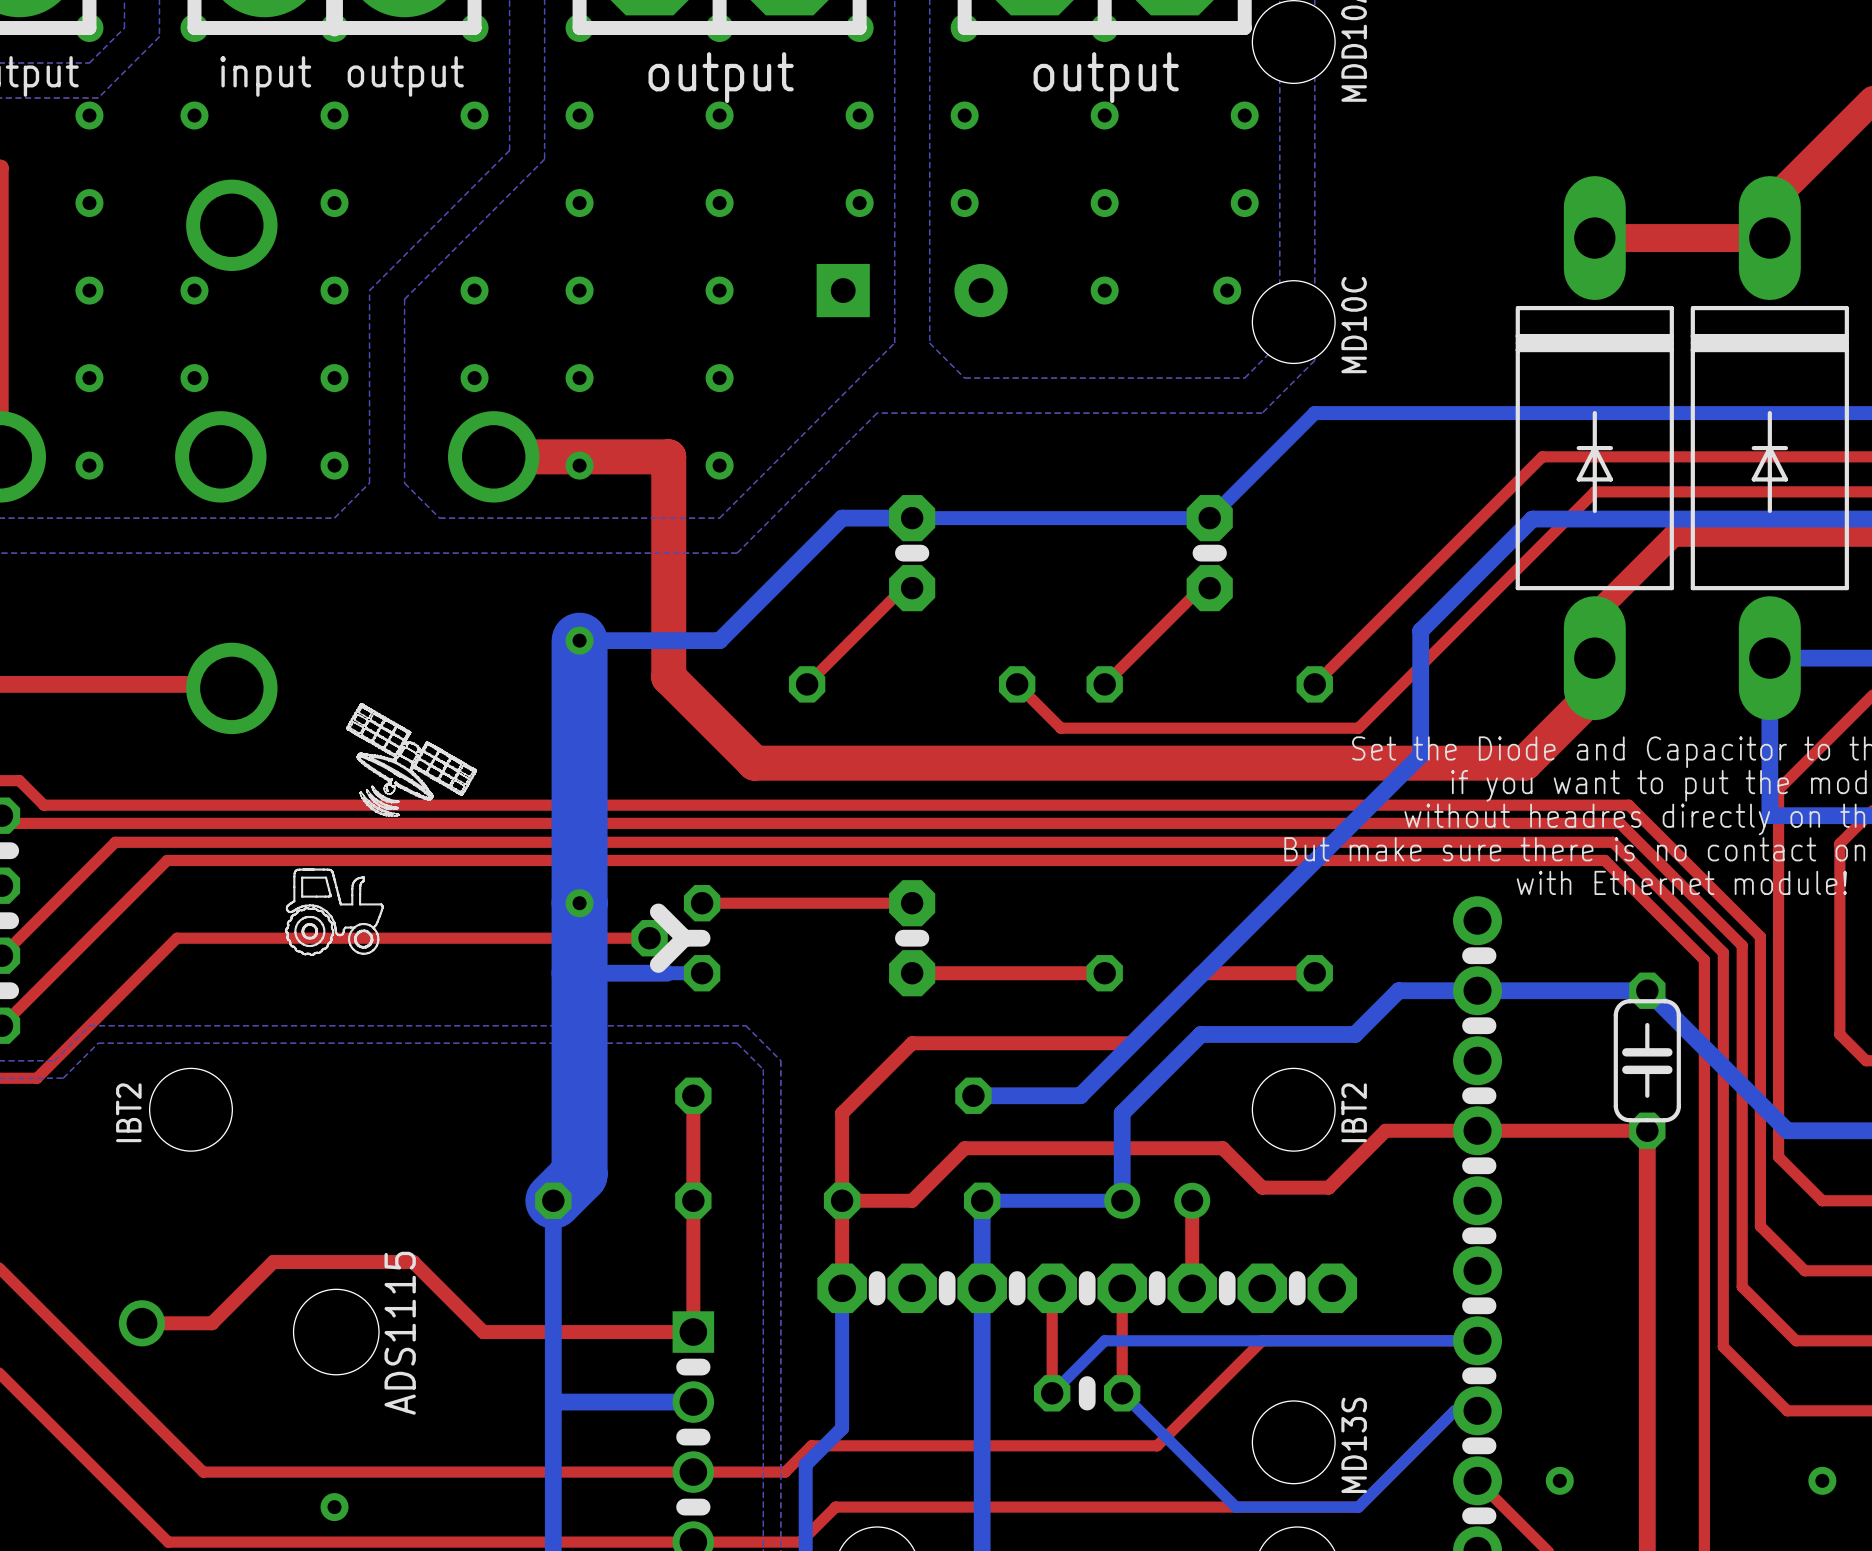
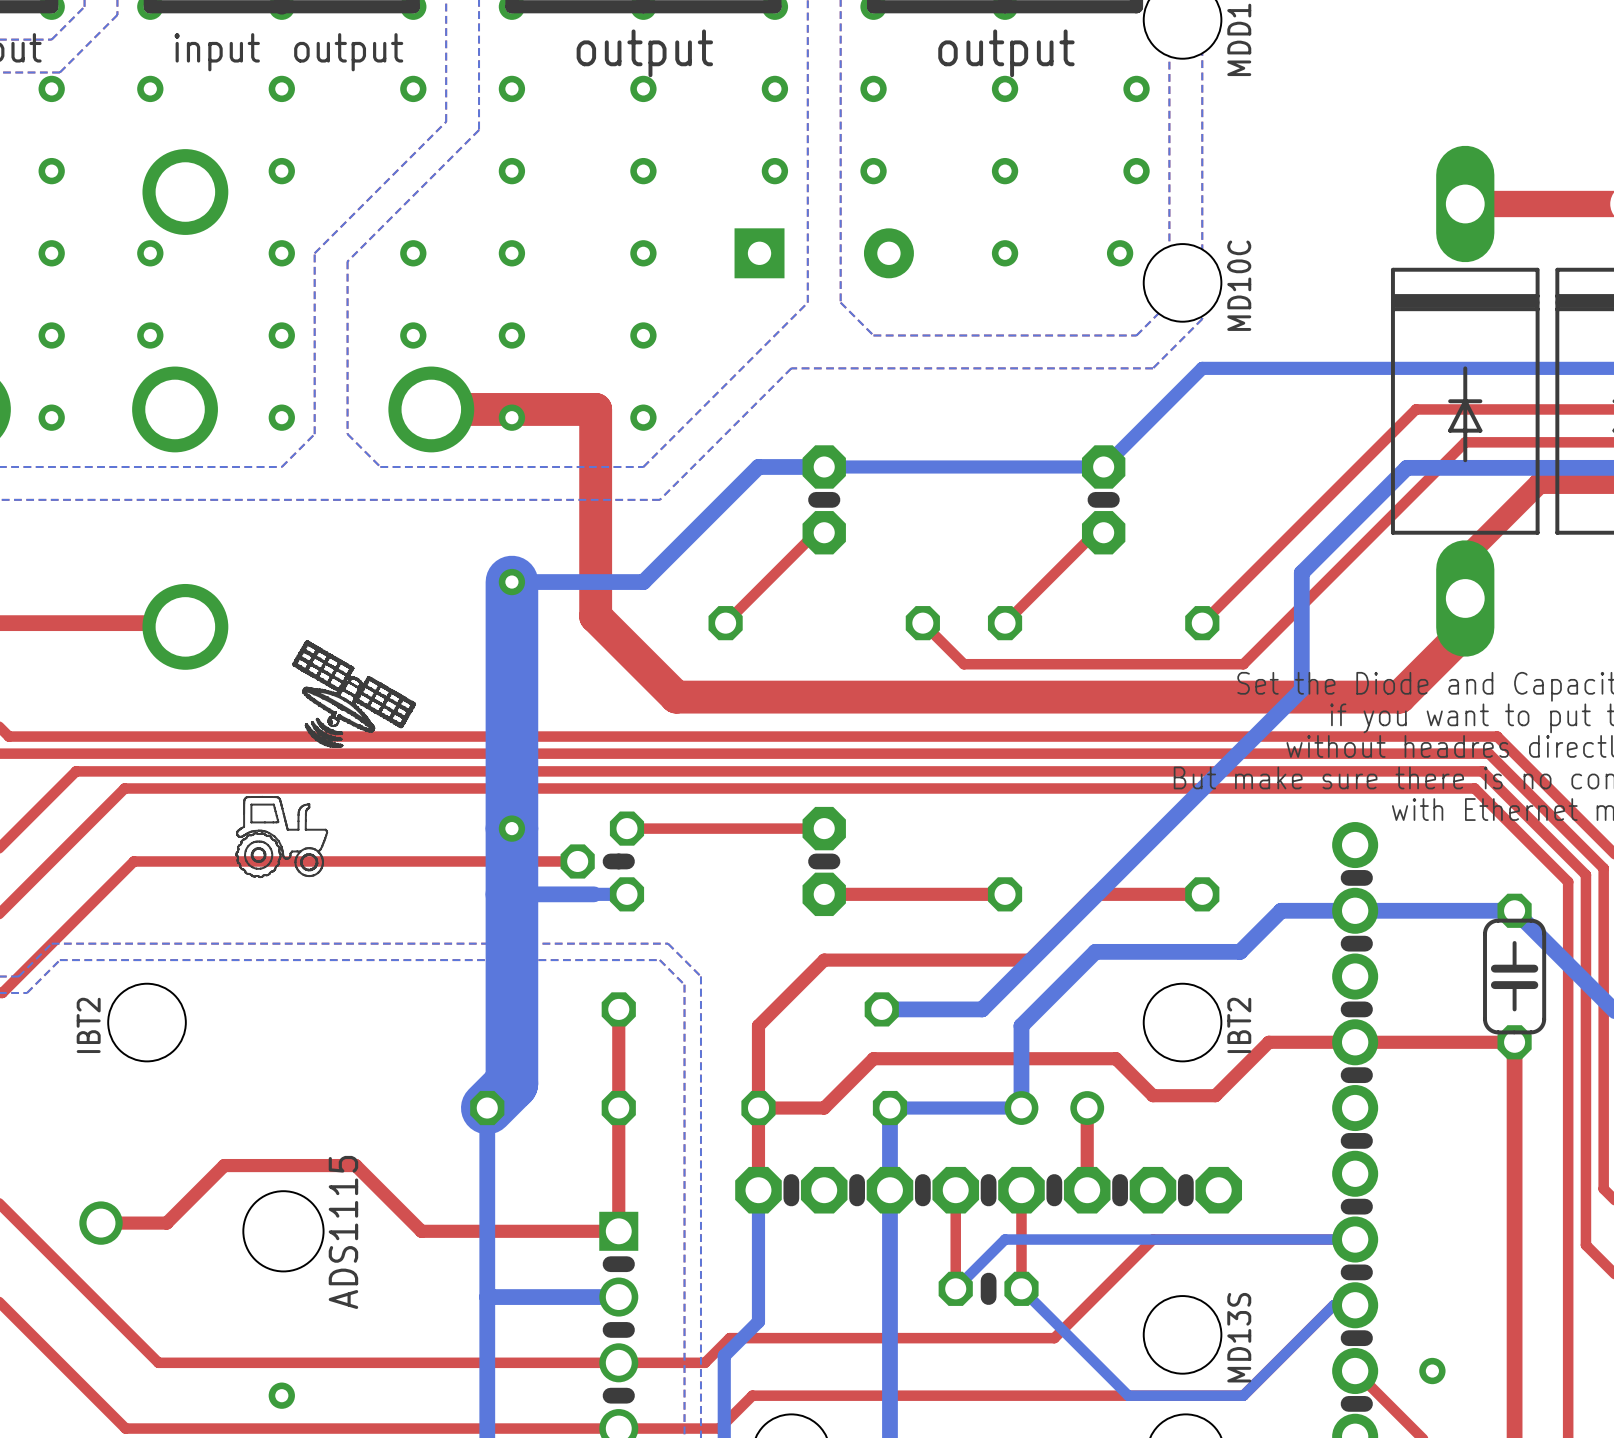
line: (658, 911) (684, 938) (658, 964) -> none

